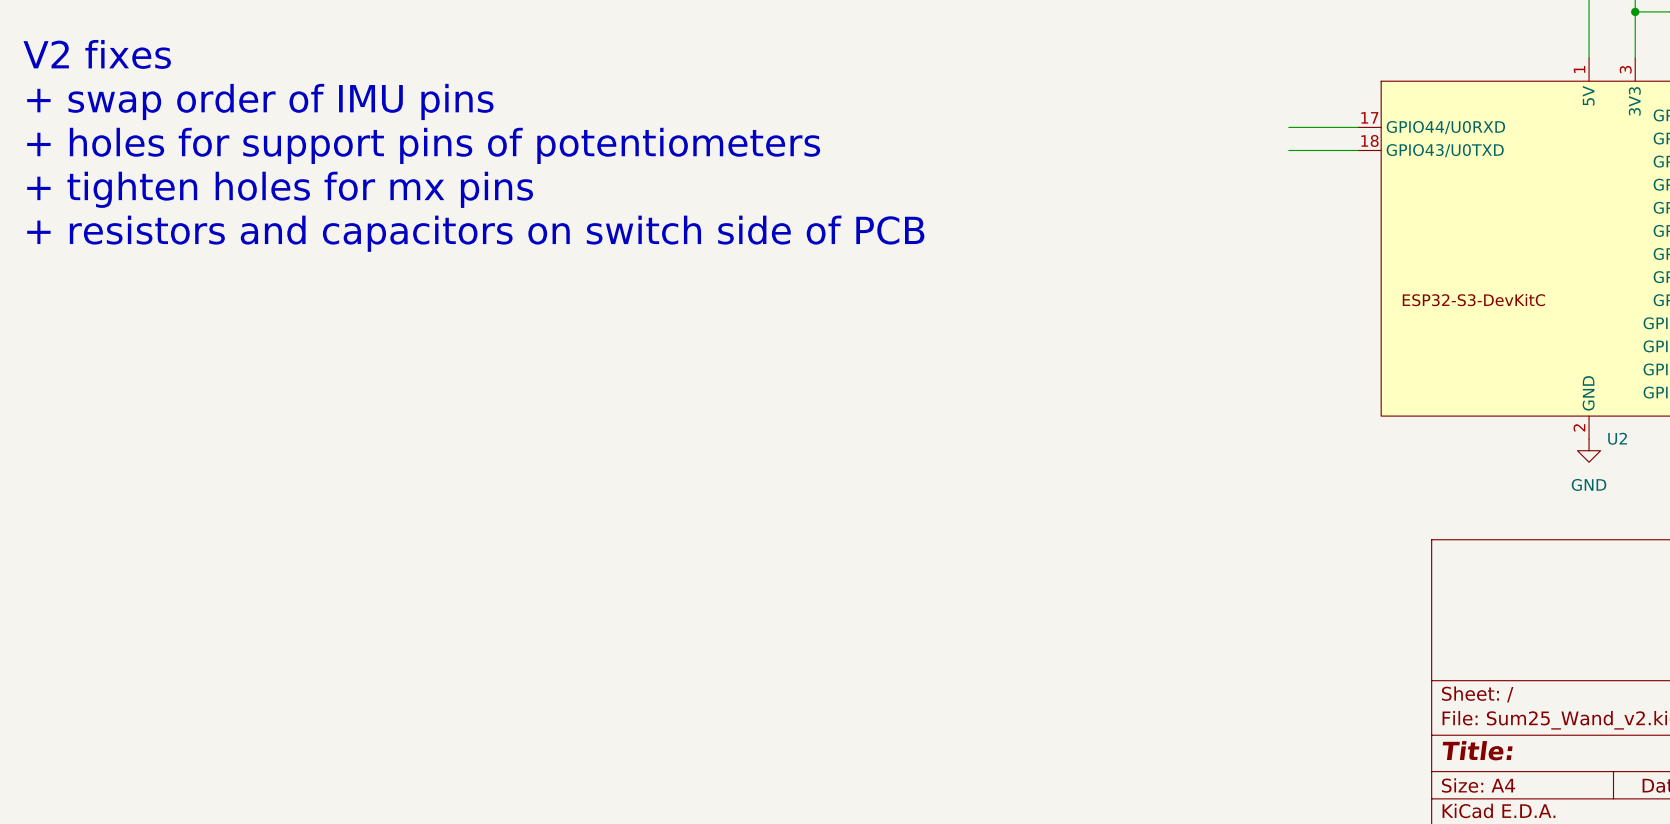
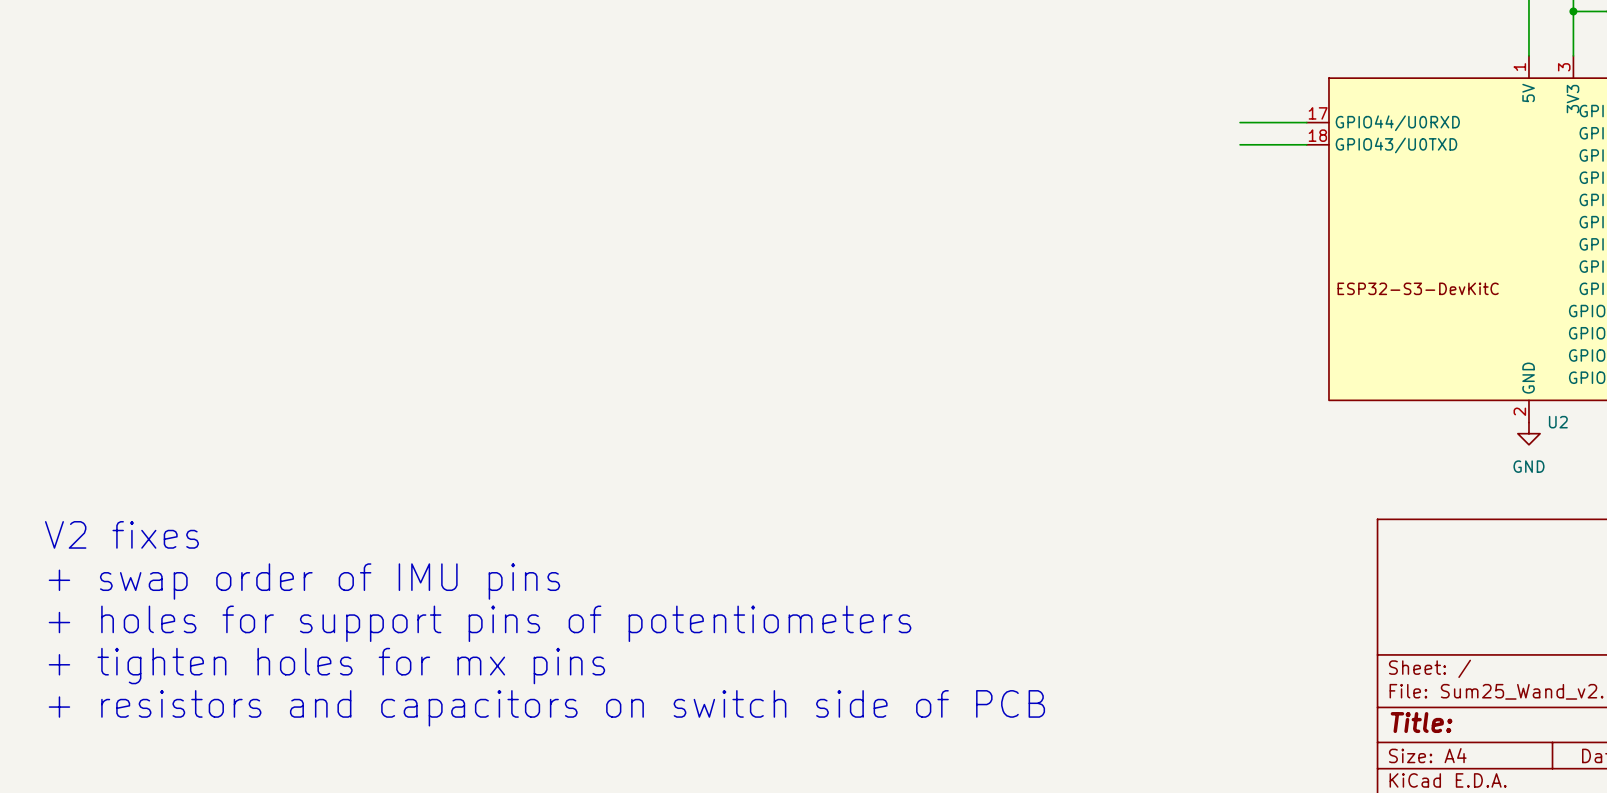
text: V2 fixes (97, 54) -> none
text: + swap order of IMU pins (260, 101) -> none
text: + holes for support pins of potentiometers (423, 145) -> none
text: + tighten holes for mx pins (280, 189) -> none
text: + resistors and capacitors on switch side of PCB (475, 233) -> none
text: none -> V2 fixes (121, 534)
text: none -> + swap order of IMU pins (304, 581)
text: none -> + holes for support pins of potentiometers (480, 623)
text: none -> + tighten holes for mx pins (326, 666)
text: none -> + resistors and capacitors on switch side of PCB (546, 708)

